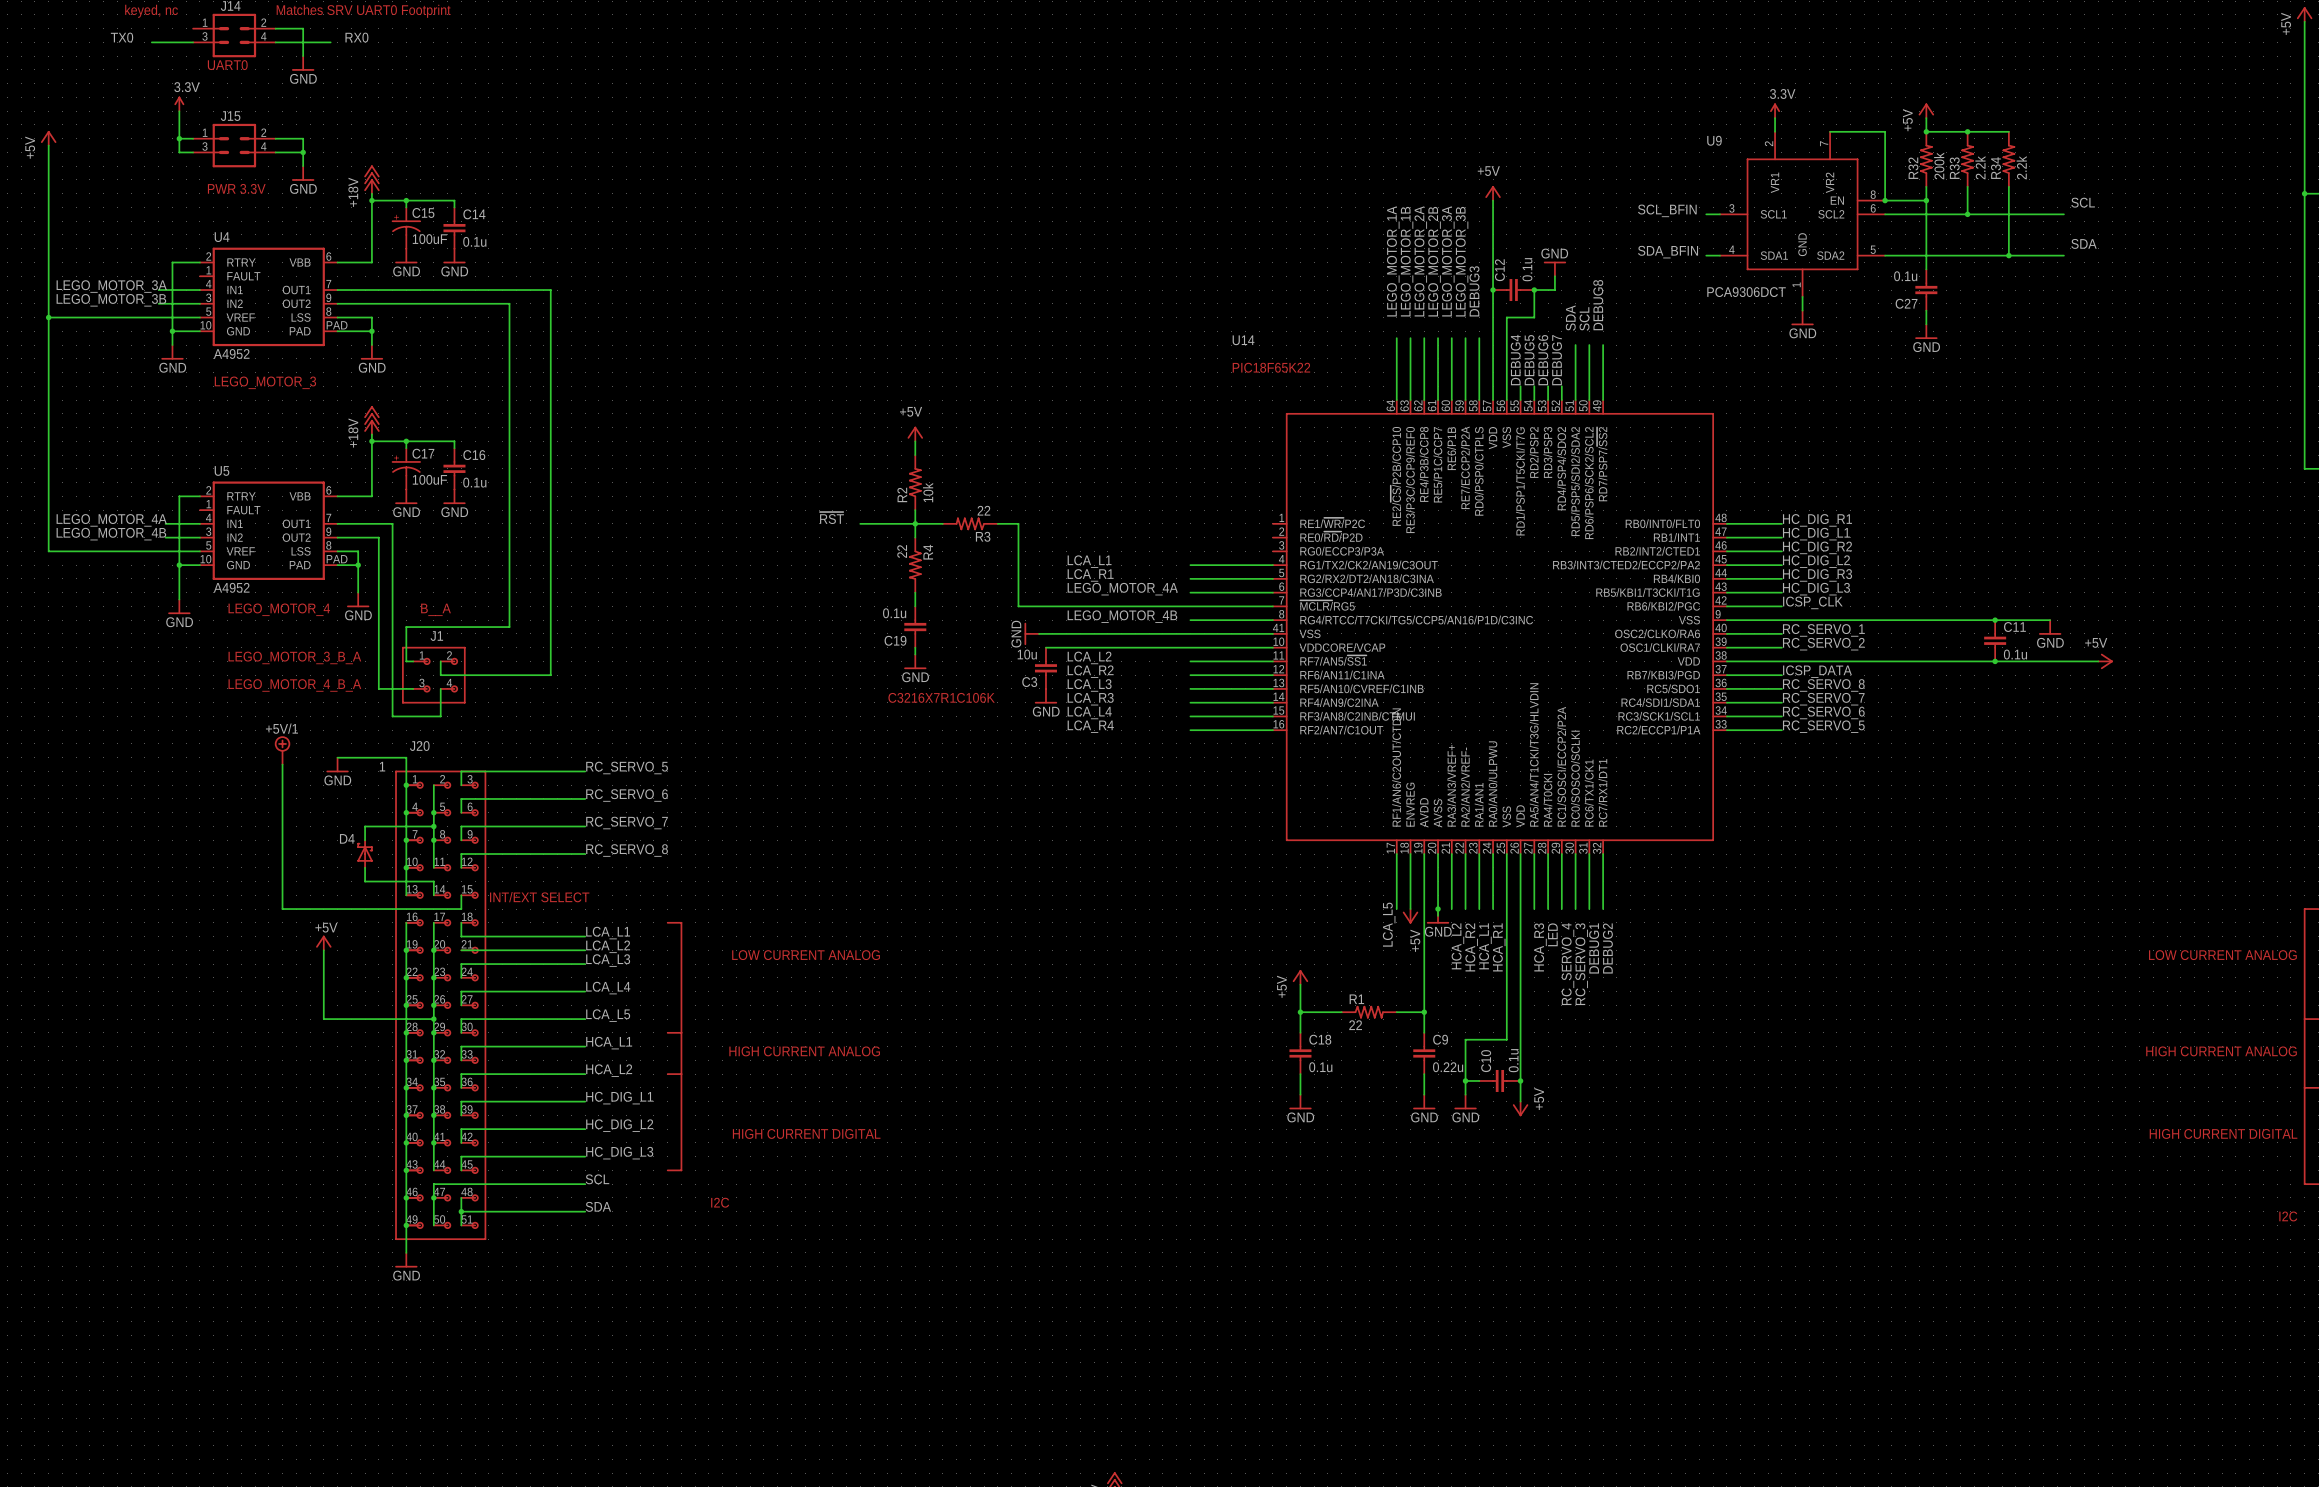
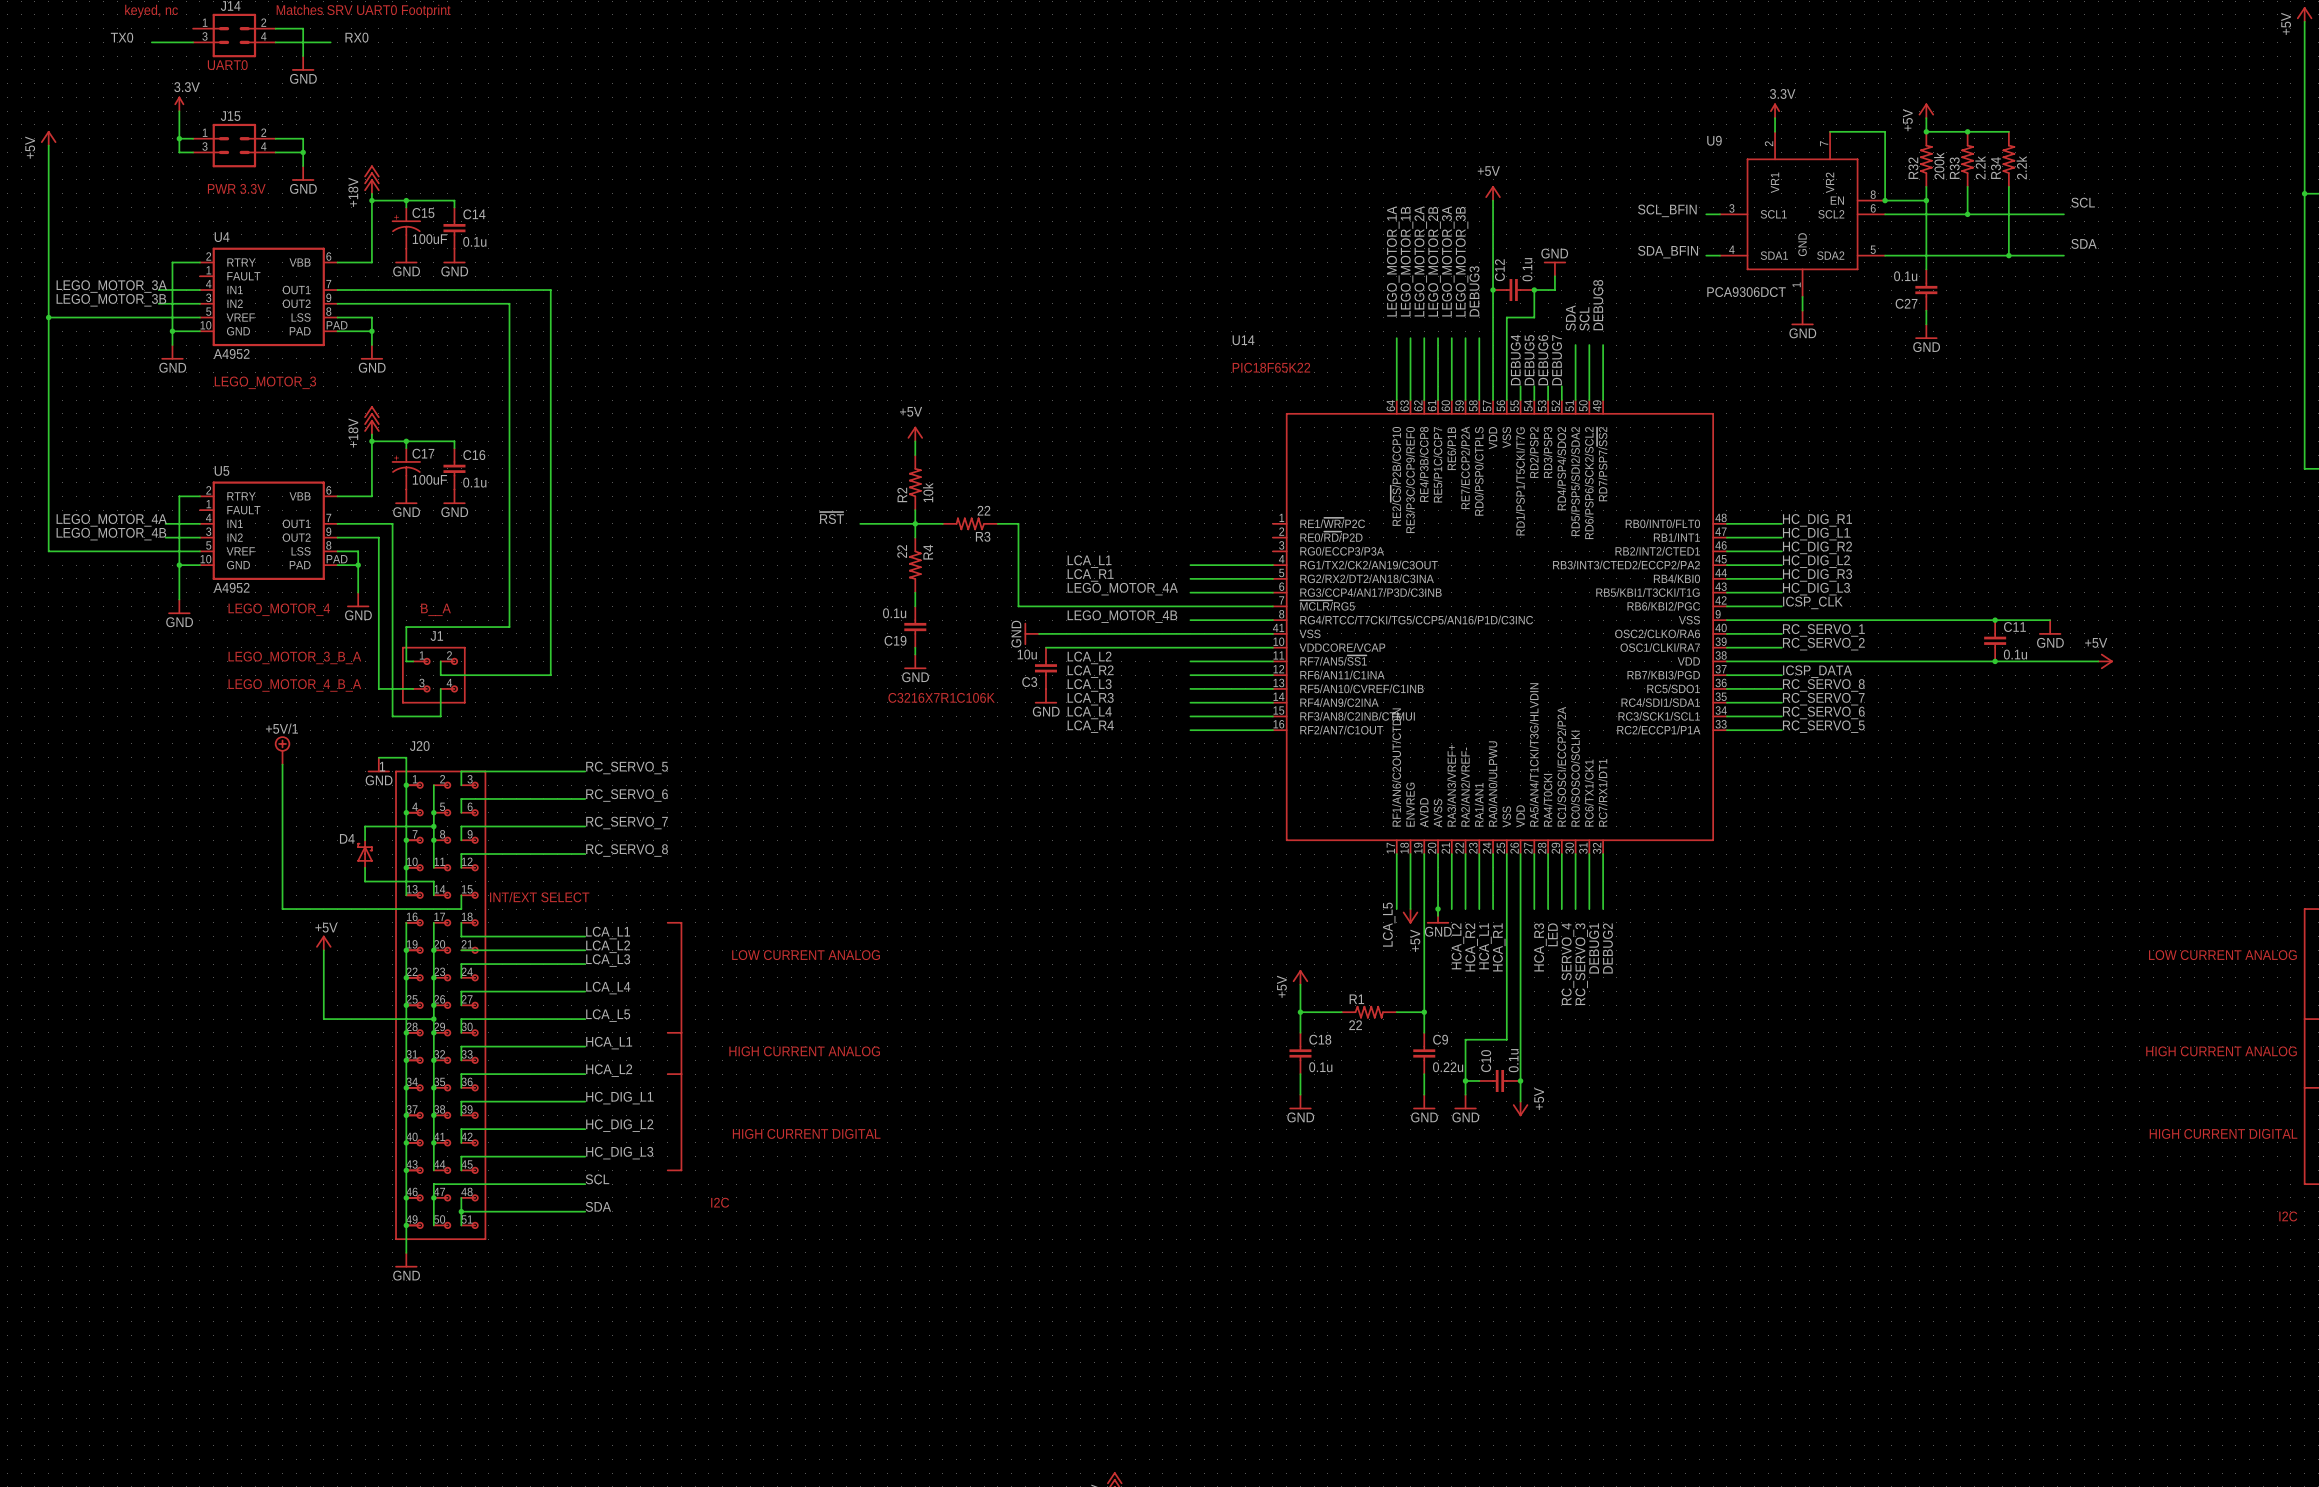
wire: (337, 757) (378, 757) -> none
power symbol position: GND (337, 764) -> GND (378, 764)

